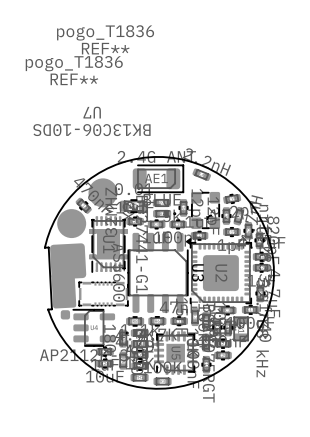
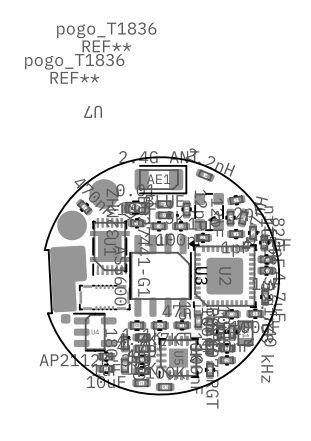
U7 value: BK13C06-10DS (92, 130) -> none

